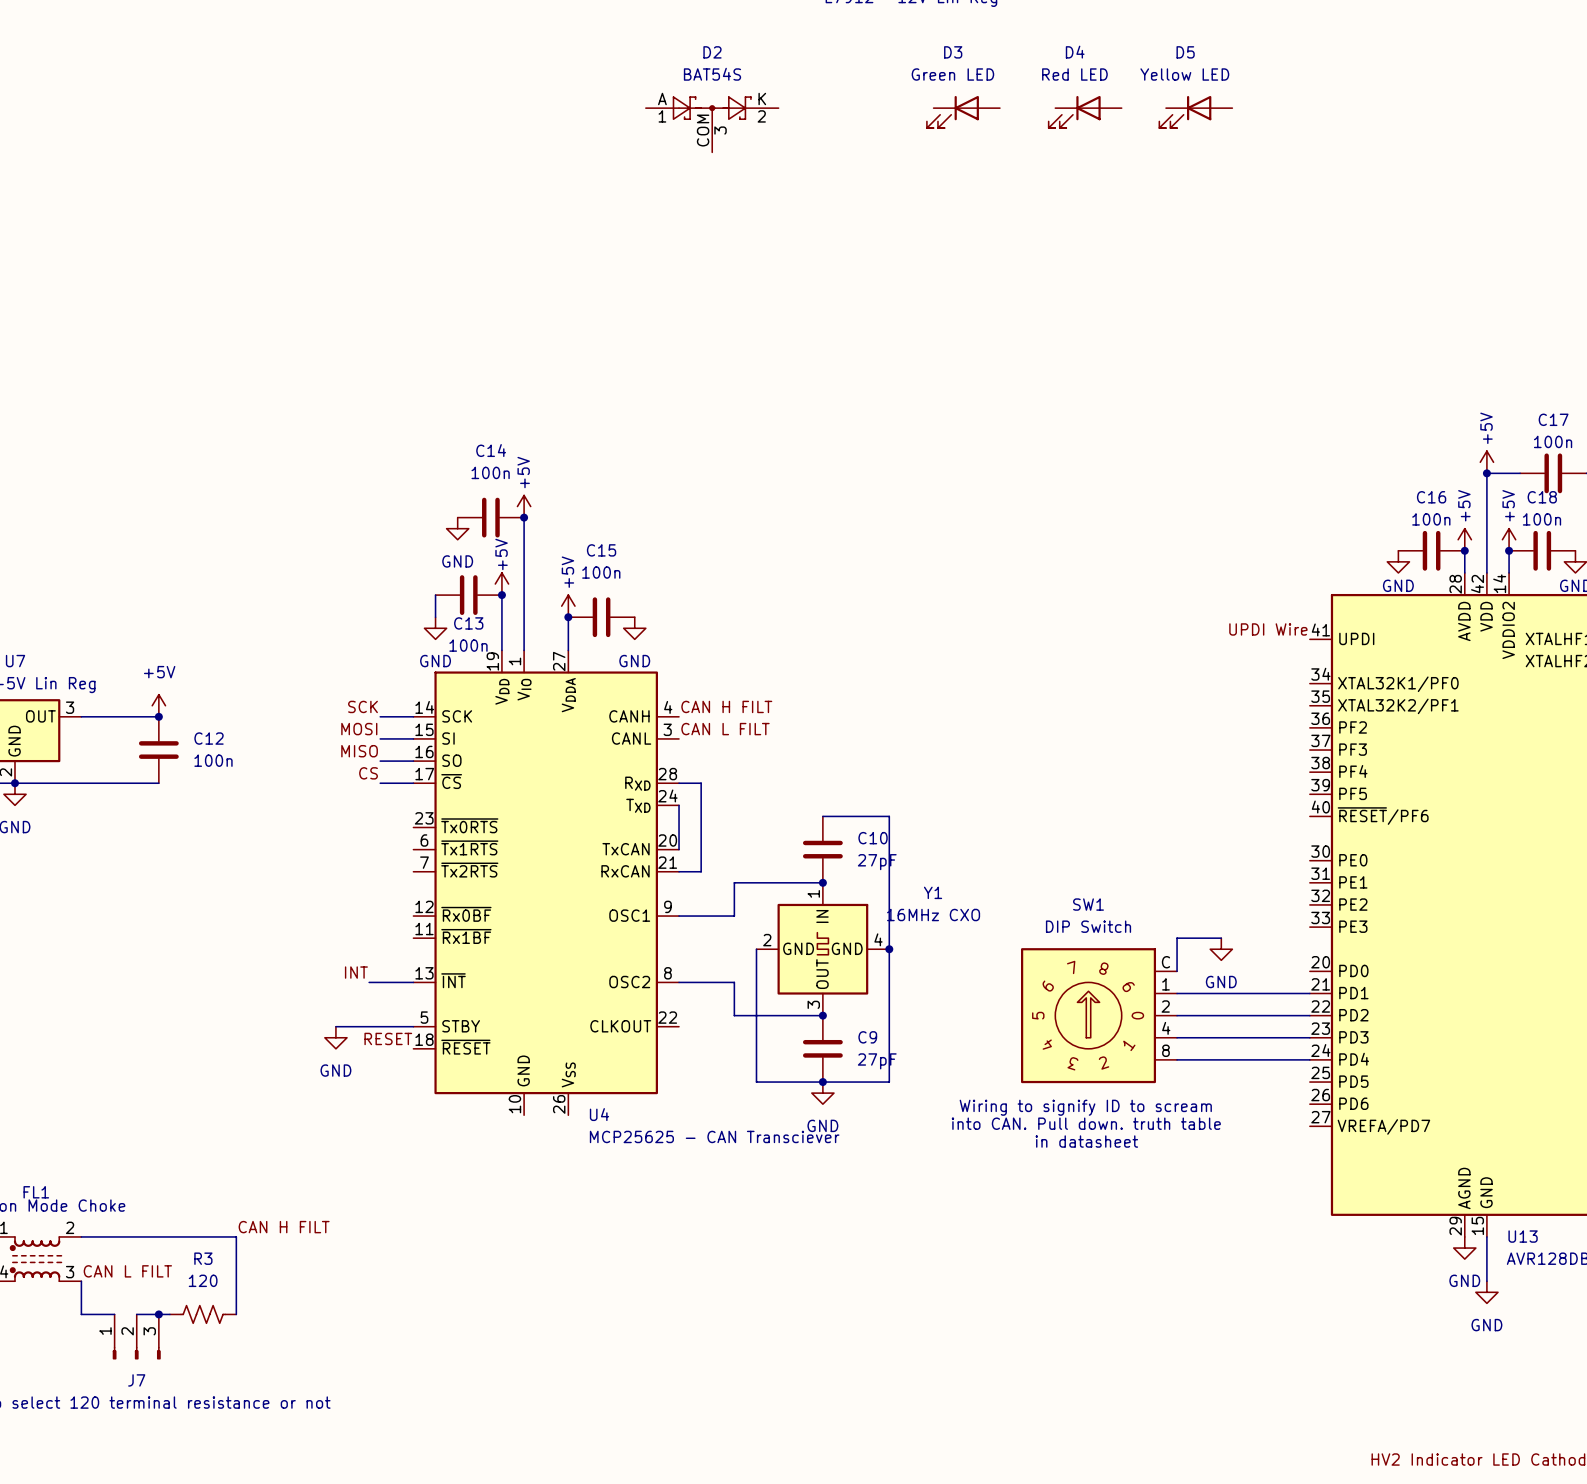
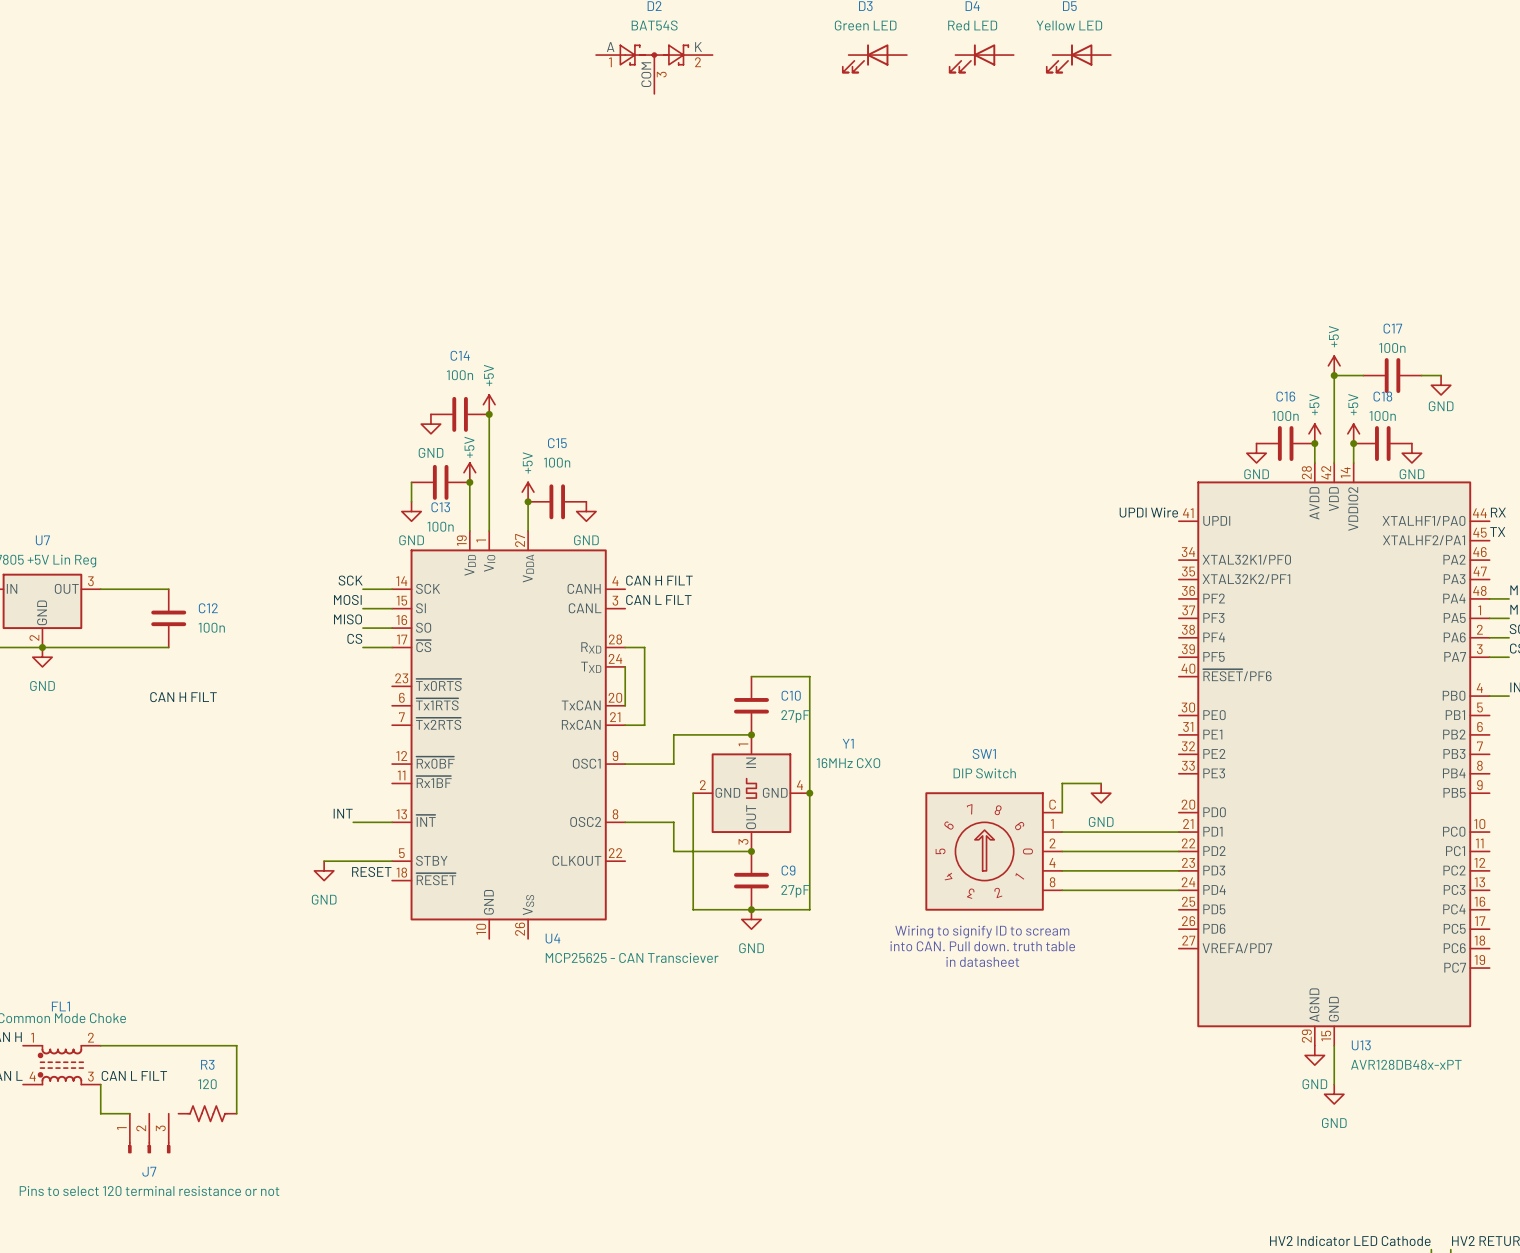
power symbol: +5V (158, 705) -> none
junction: (158, 716) -> none
label: none -> CAN H FILT (183, 697)
label: CAN H FILT (284, 1227) -> none
wire: (136, 1314) (169, 1314) -> none
junction: (158, 1314) -> none

